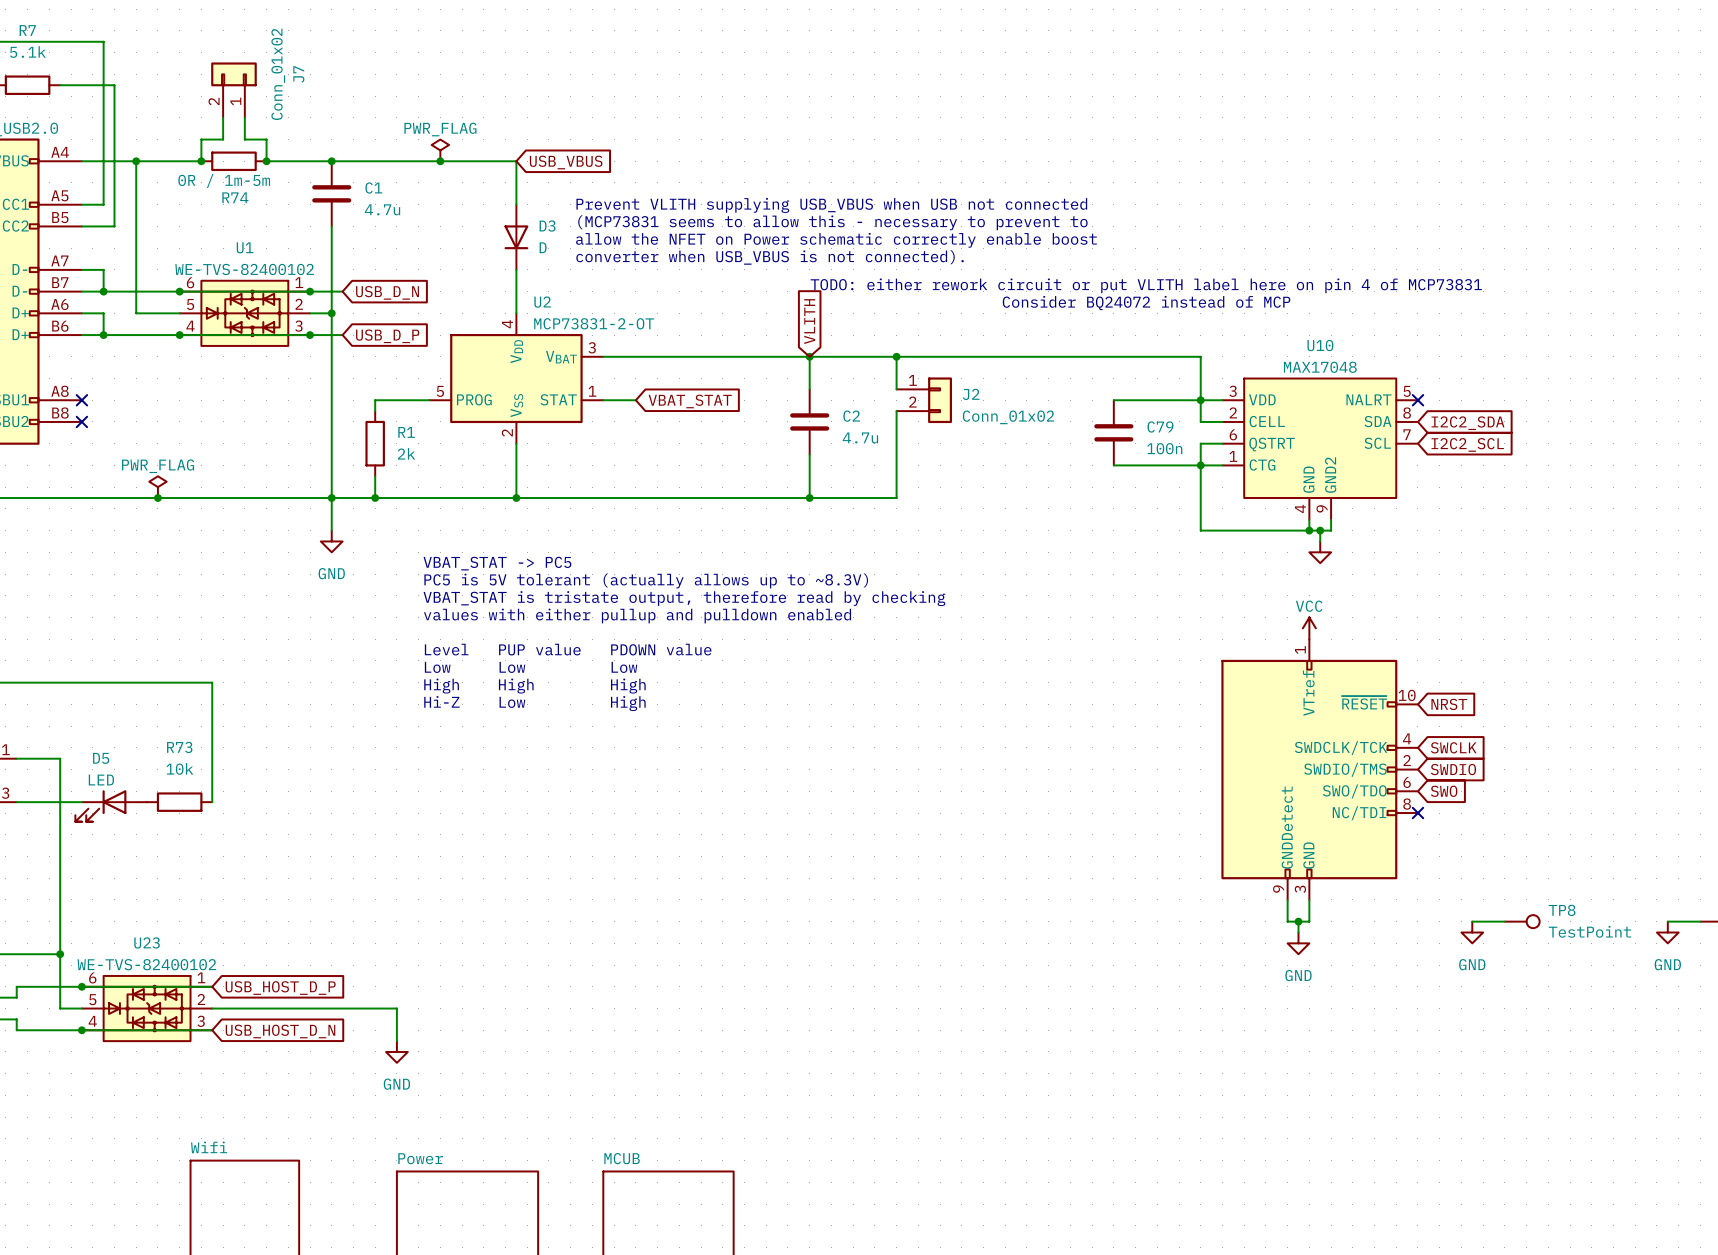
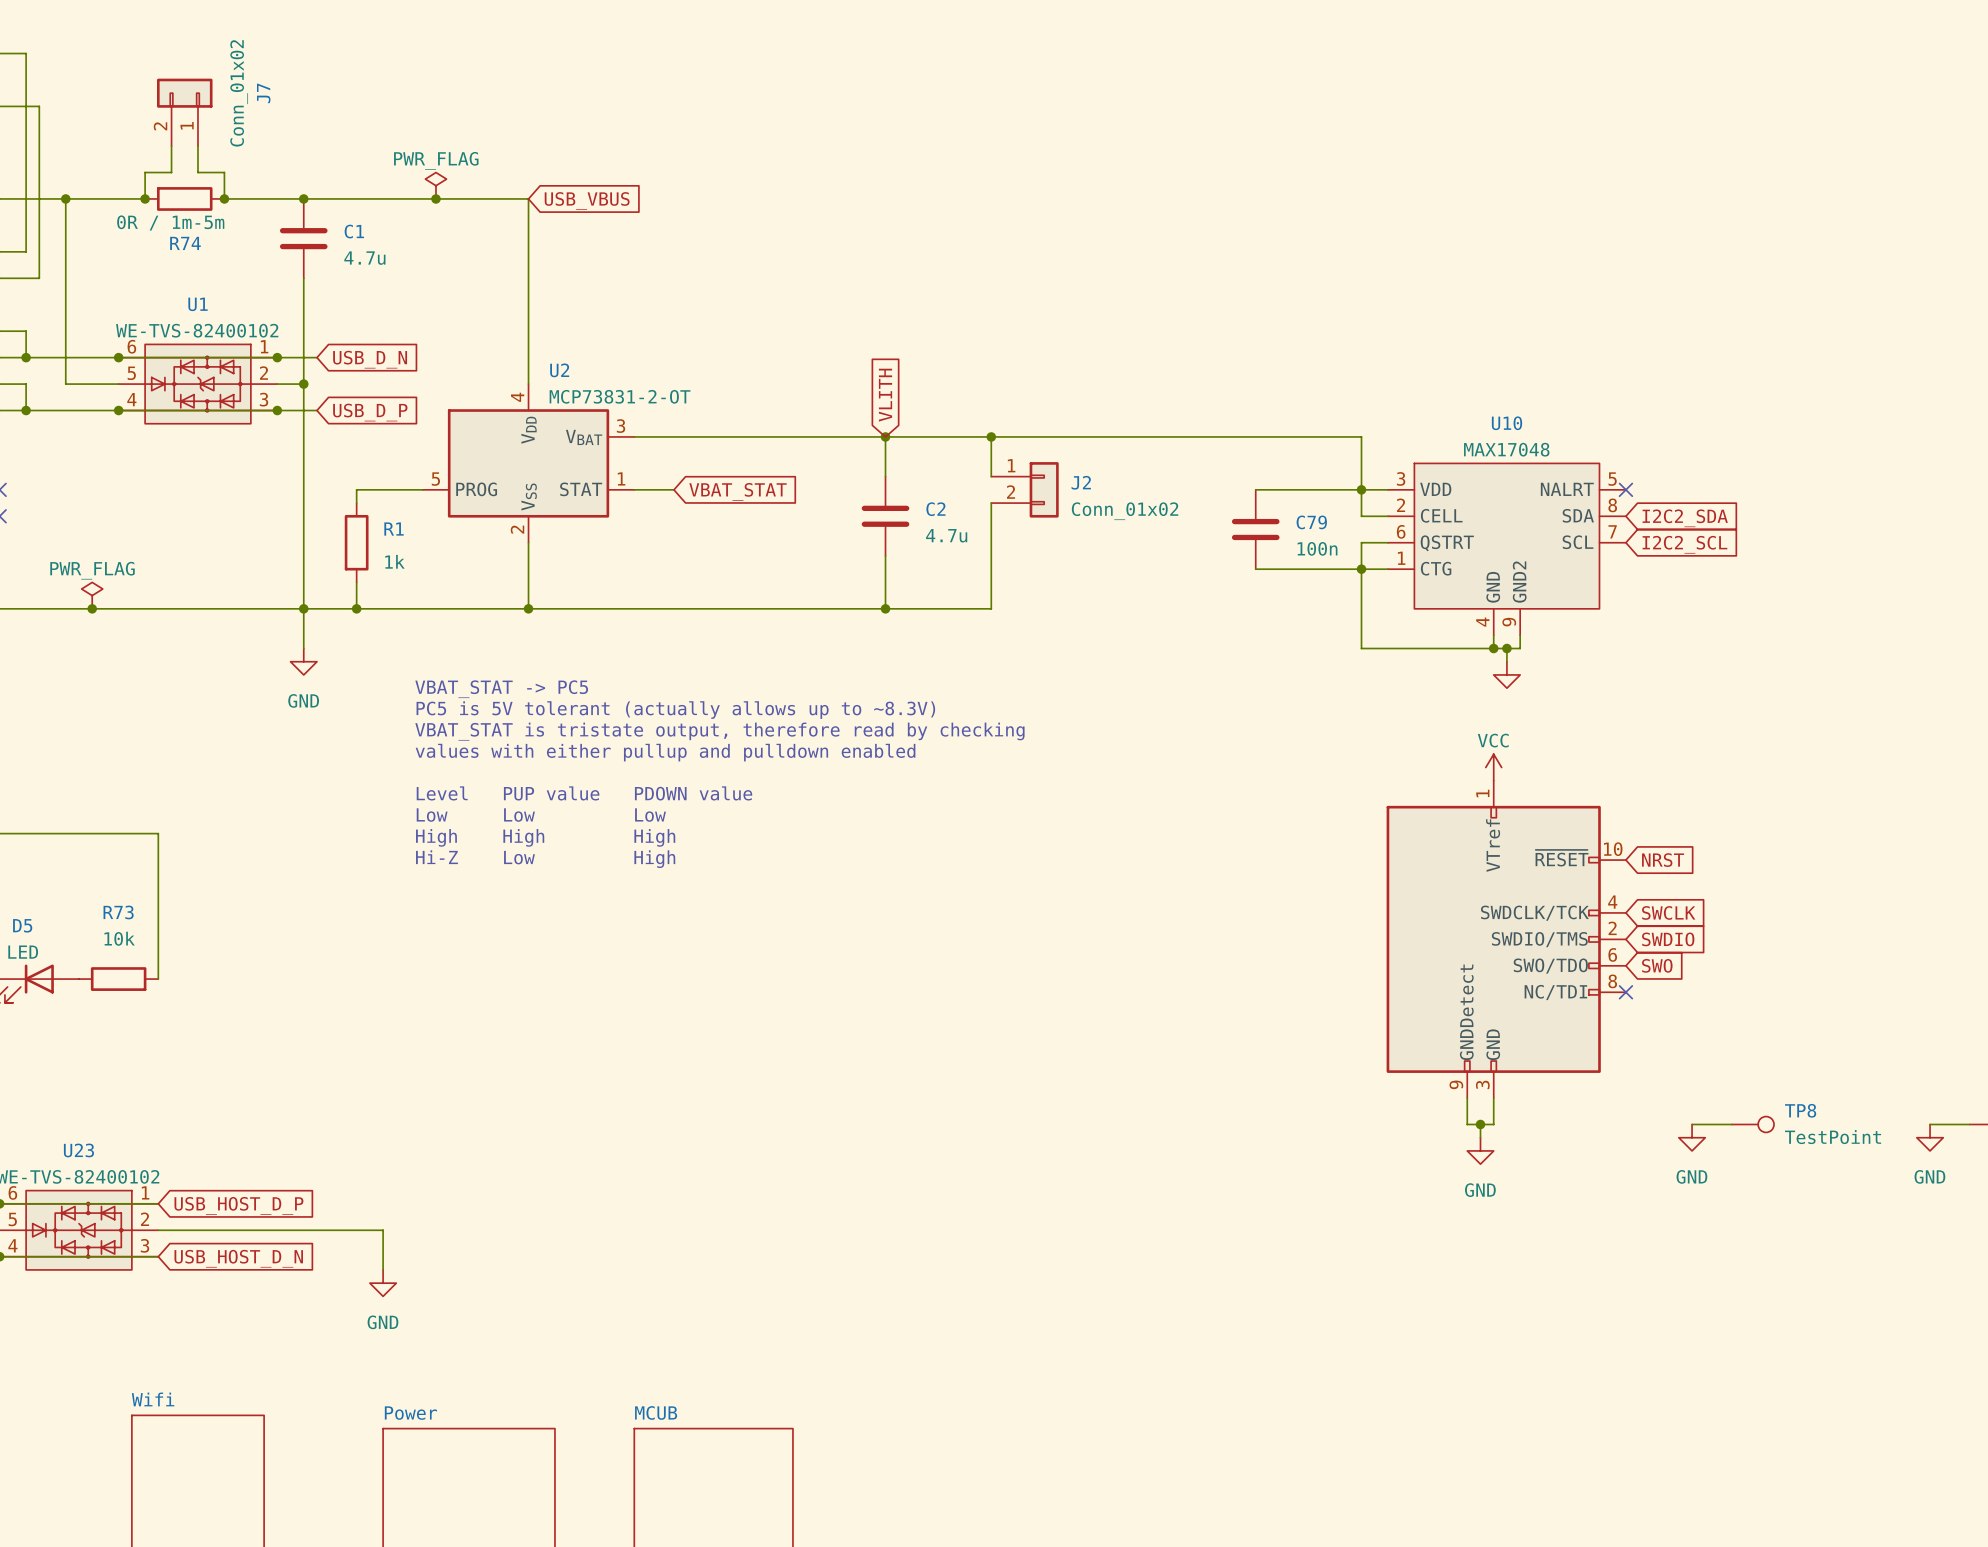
text: Prevent VLITH supplying USB_VBUS when USB not connected (831, 205) -> none
text: (MCP73831 seems to allow this - necessary to prevent to (832, 222) -> none
D3: D (516, 237) -> none
text: allow the NFET on Power schematic correctly enable boost (836, 240) -> none
text: converter when USB_VBUS is not connected). (770, 257) -> none
text: TODO: either rework circuit or put VLITH label here on pin 4 of MCP73831 (1146, 285) -> none
text: Consider BQ24072 instead of MCP (1146, 303) -> none
R1 value: 2k (406, 453) -> 1k (394, 561)

